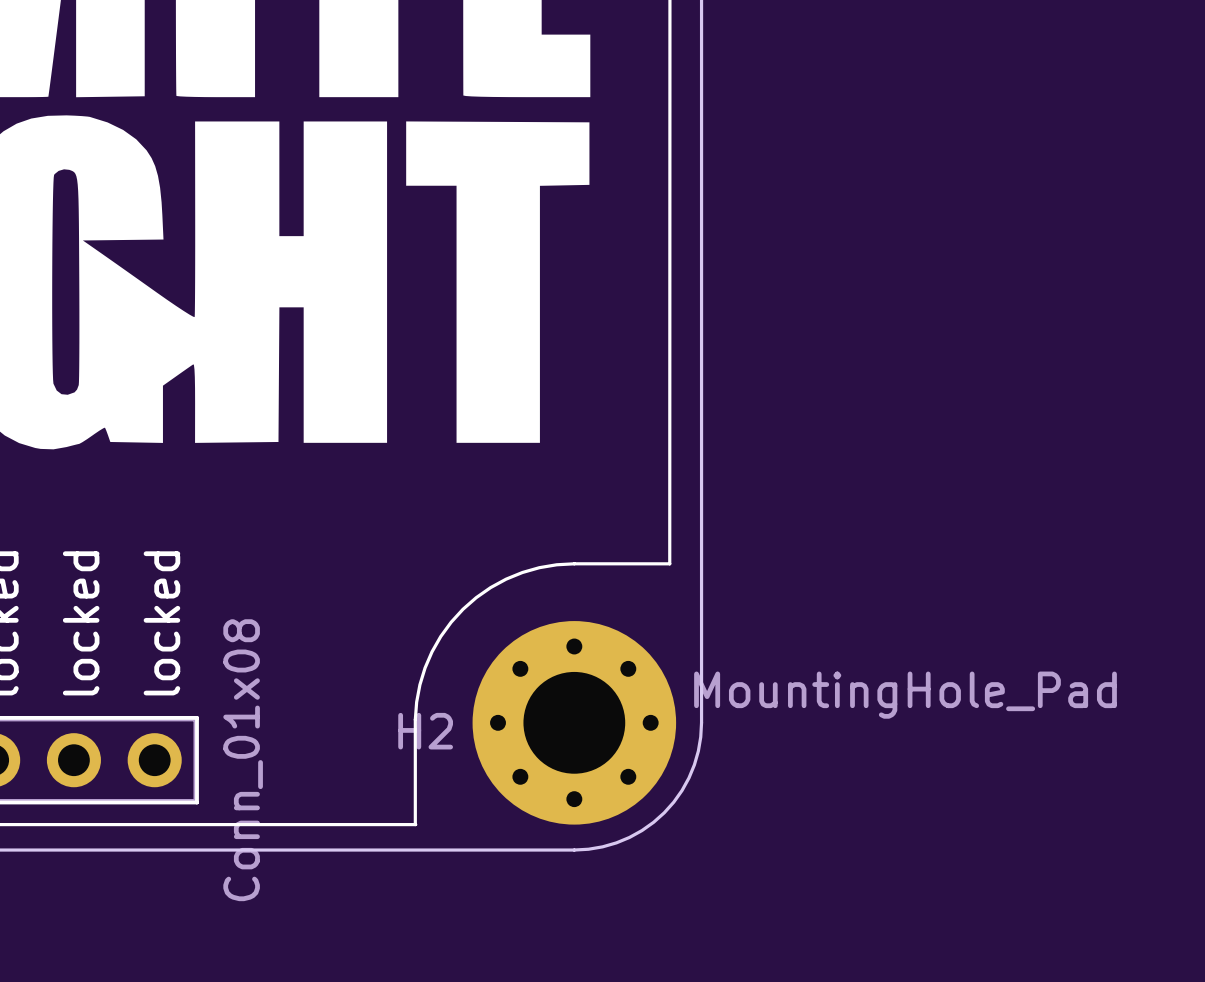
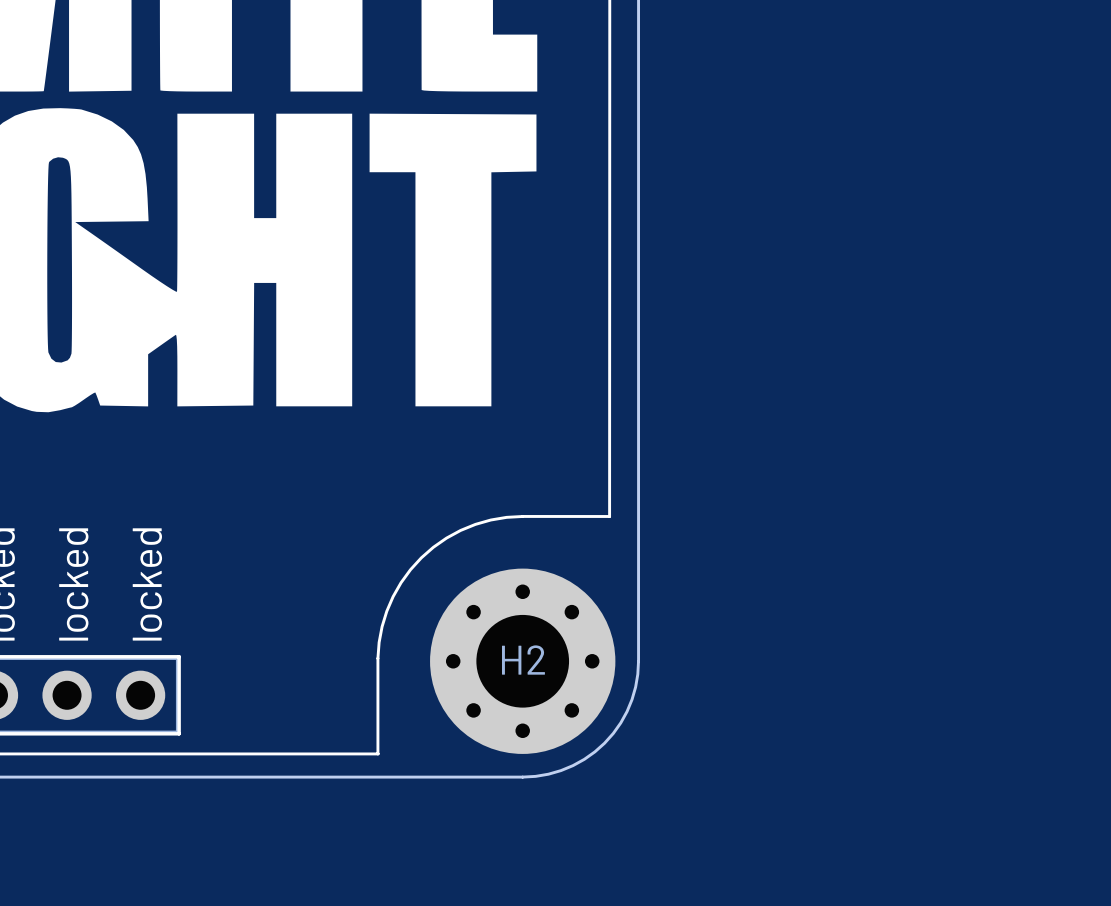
H2 value: MountingHole_Pad (905, 695) -> none
H2 name position: H2 (425, 731) -> H2 (523, 660)
part value: Conn_01x08 (243, 760) -> none

